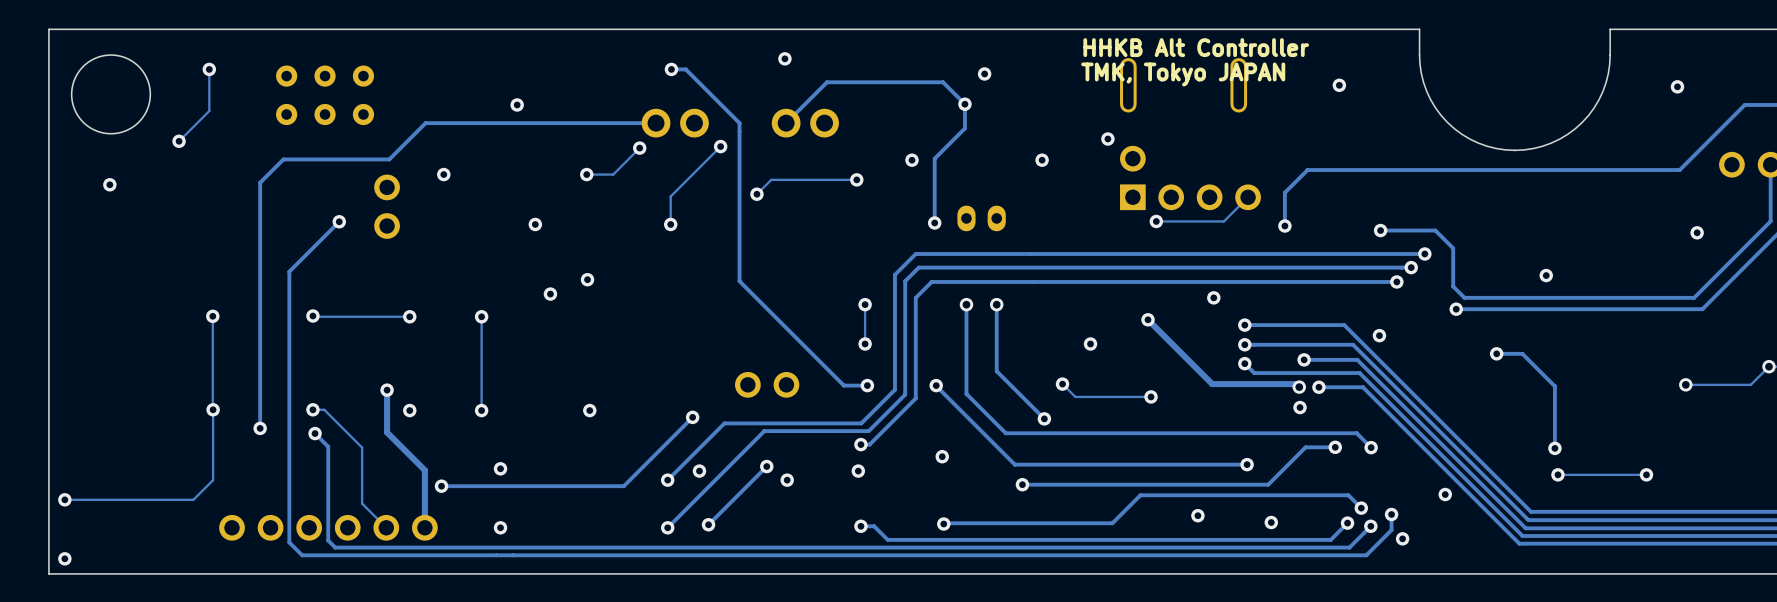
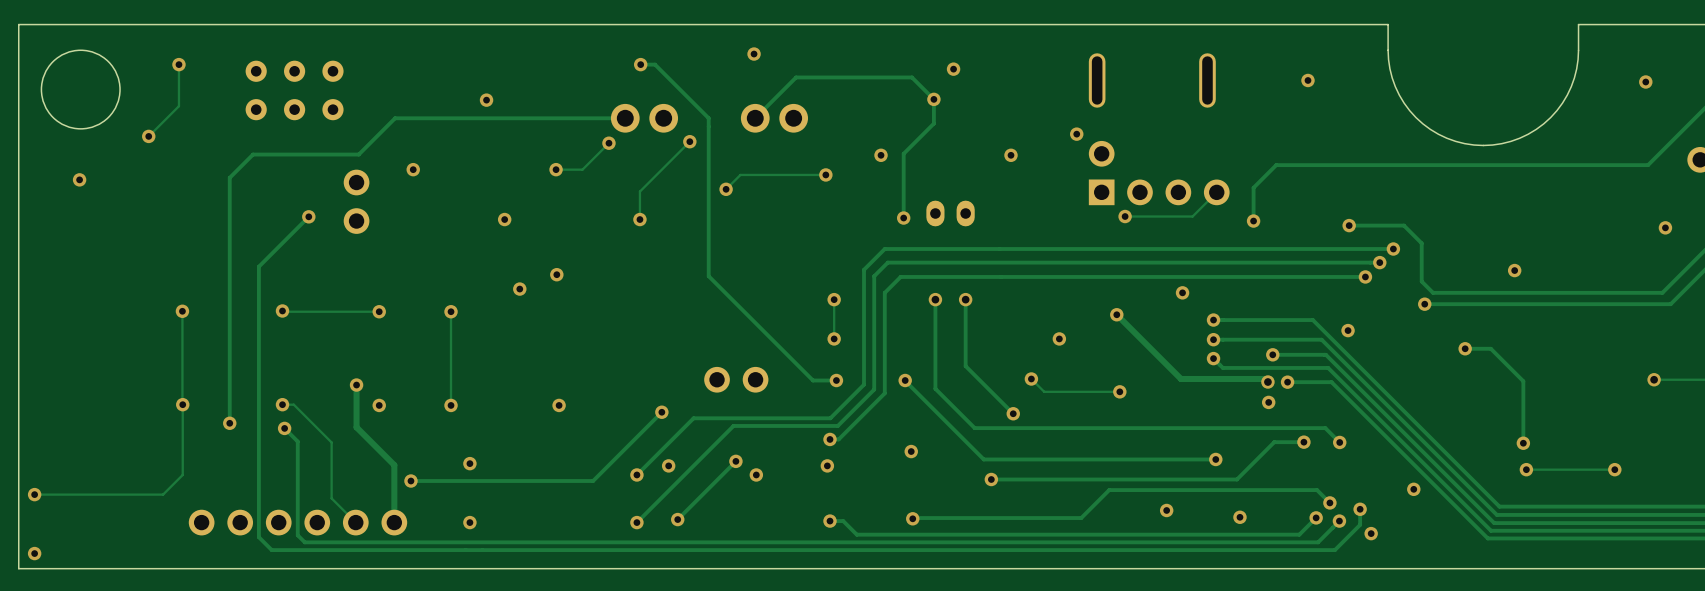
text: HHKB Alt Controller (1196, 47) -> none
text: TMK, Tokyo JAPAN (1183, 74) -> none

